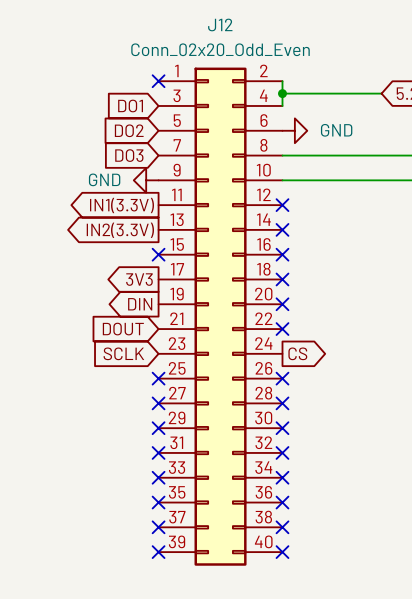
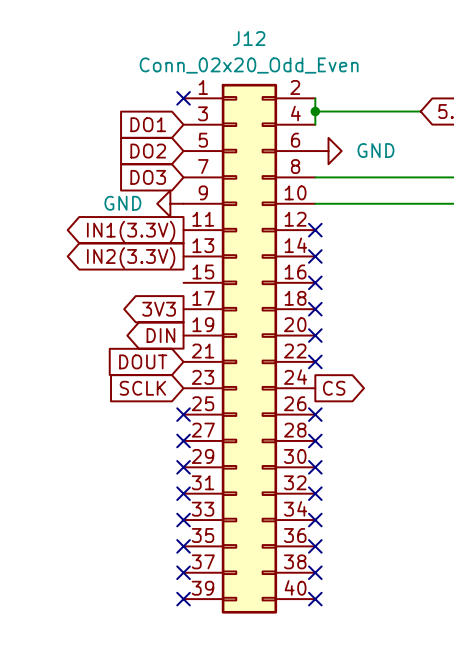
no-connect mark: (158, 254) -> none

